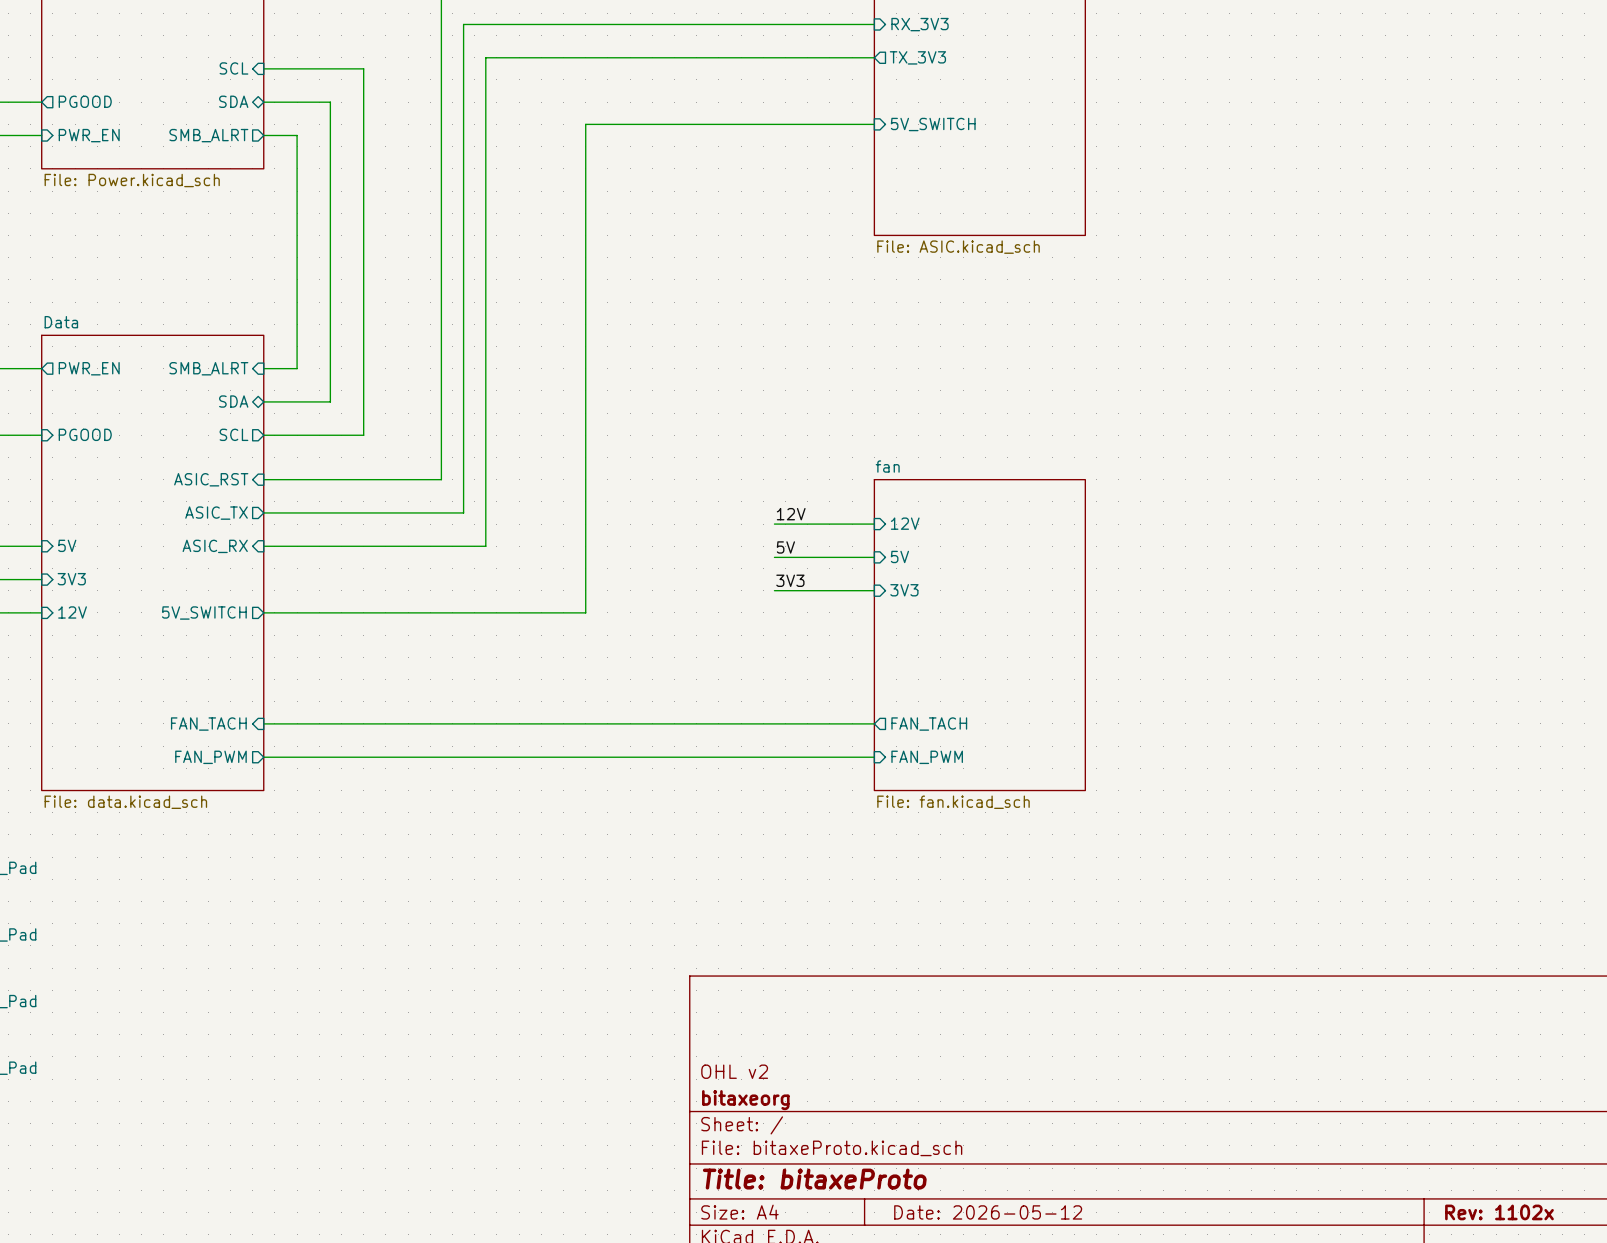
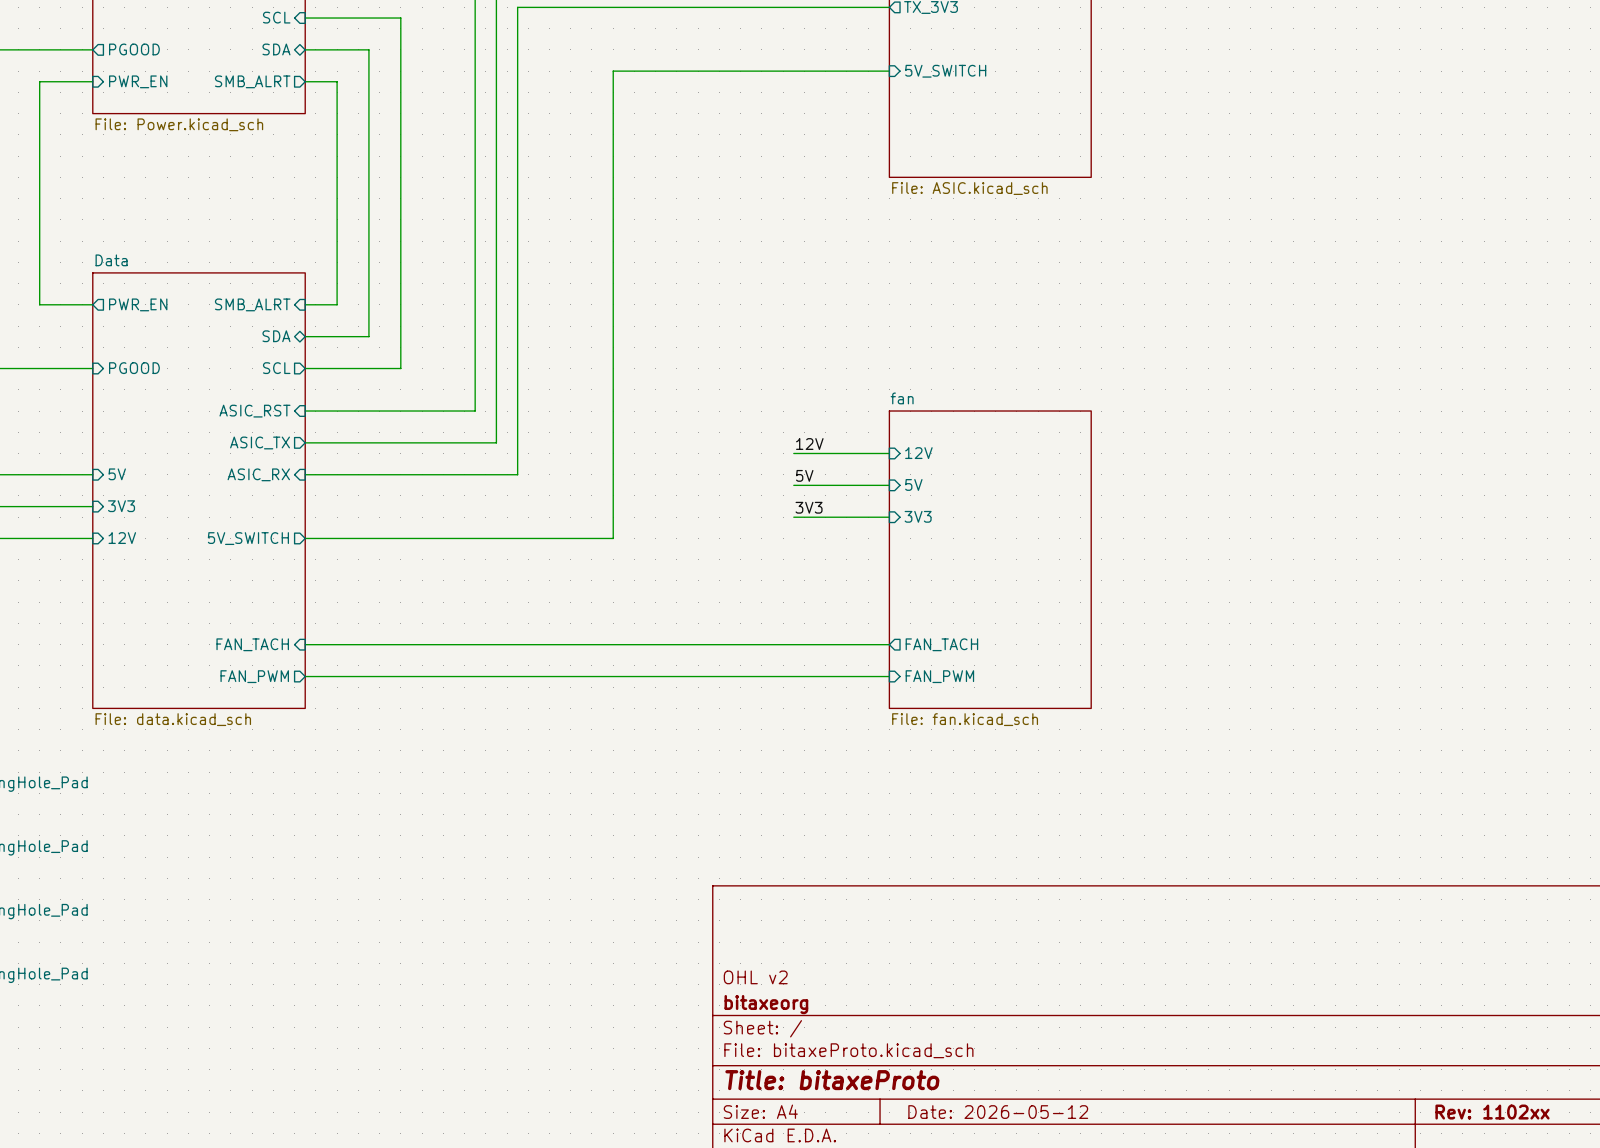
title block: Rev: 1102x (1499, 1212) -> Rev: 1102xx (1492, 1112)

